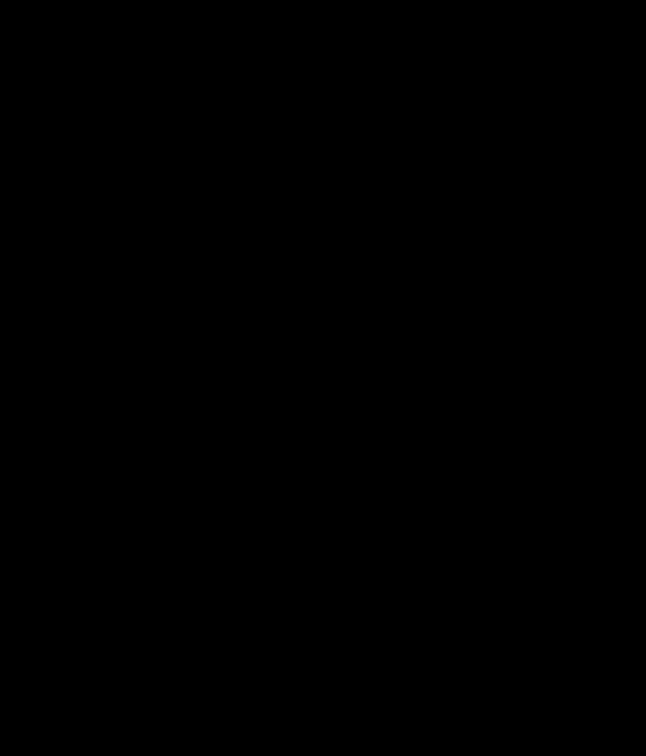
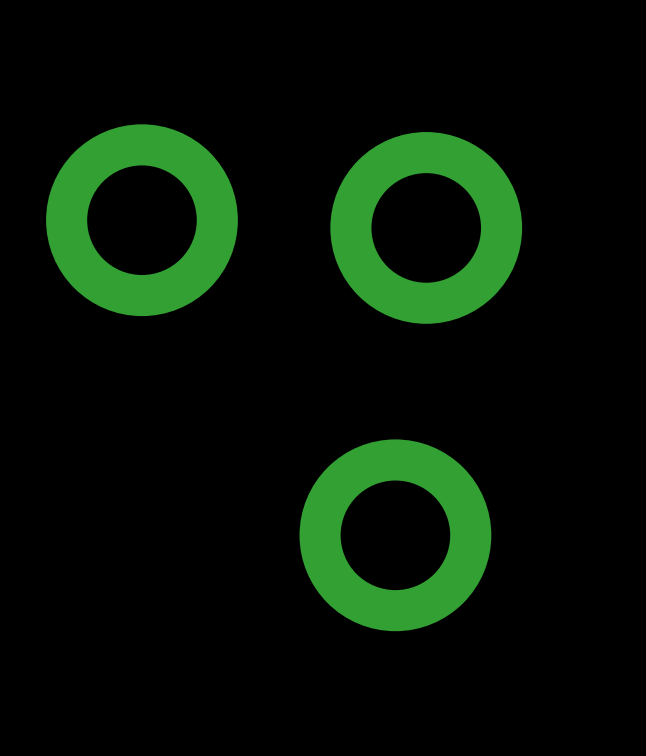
part: none -> (141, 220)
part: none -> (426, 227)
part: none -> (395, 535)

